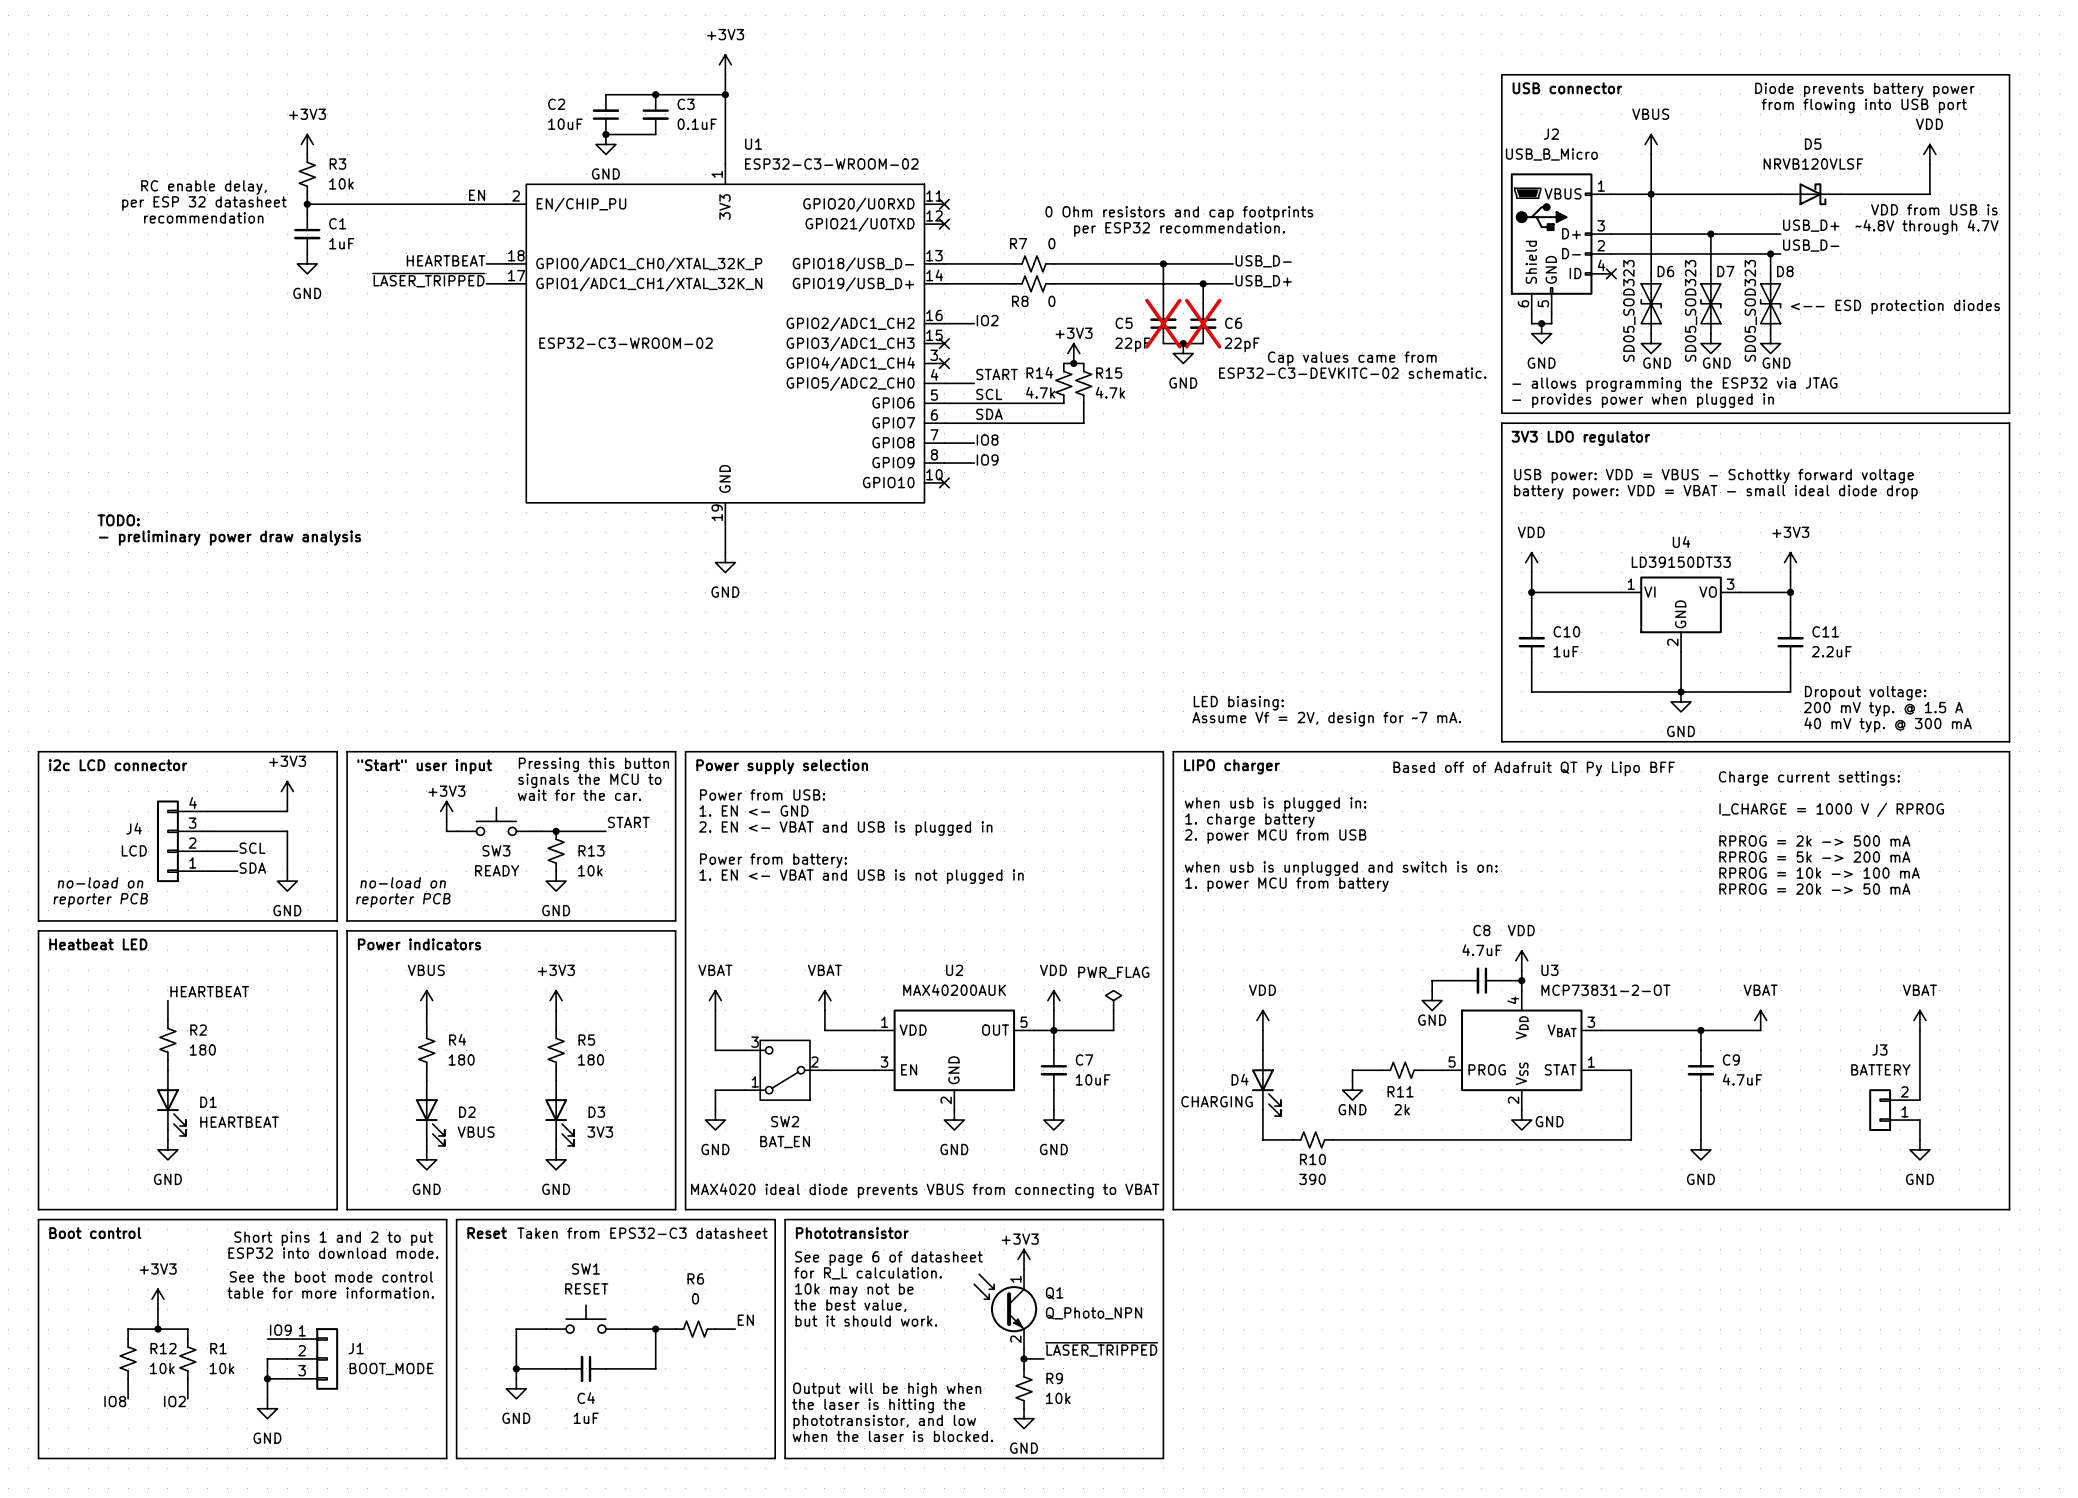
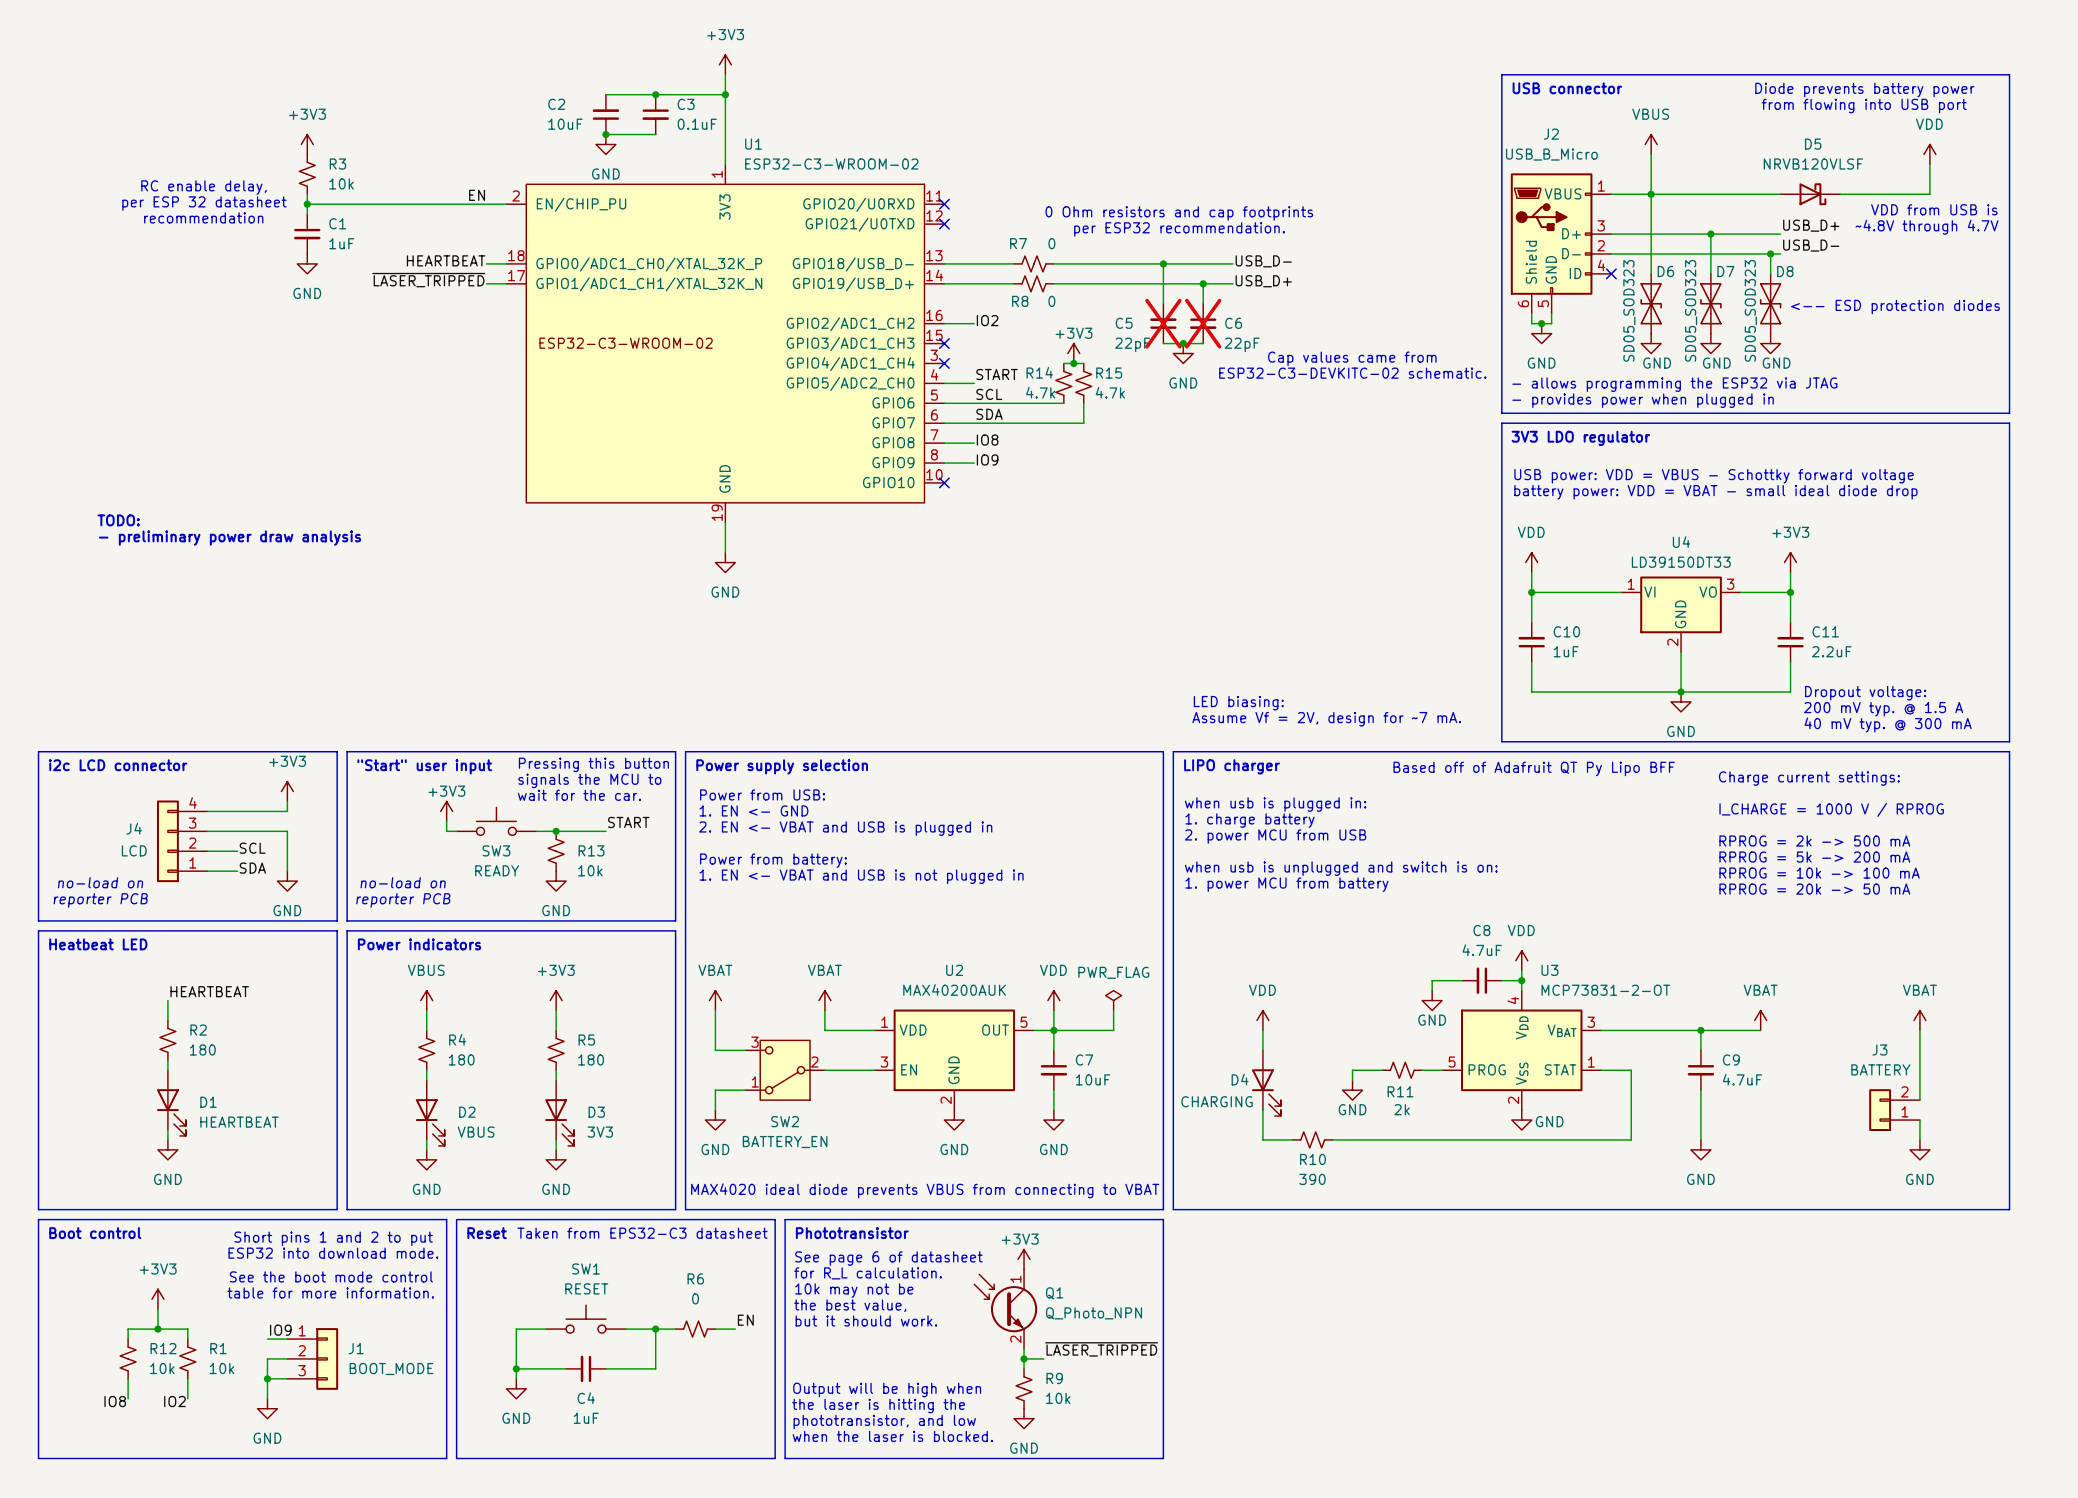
SW2 value: BAT_EN (785, 1142) -> BATTERY_EN (785, 1142)

